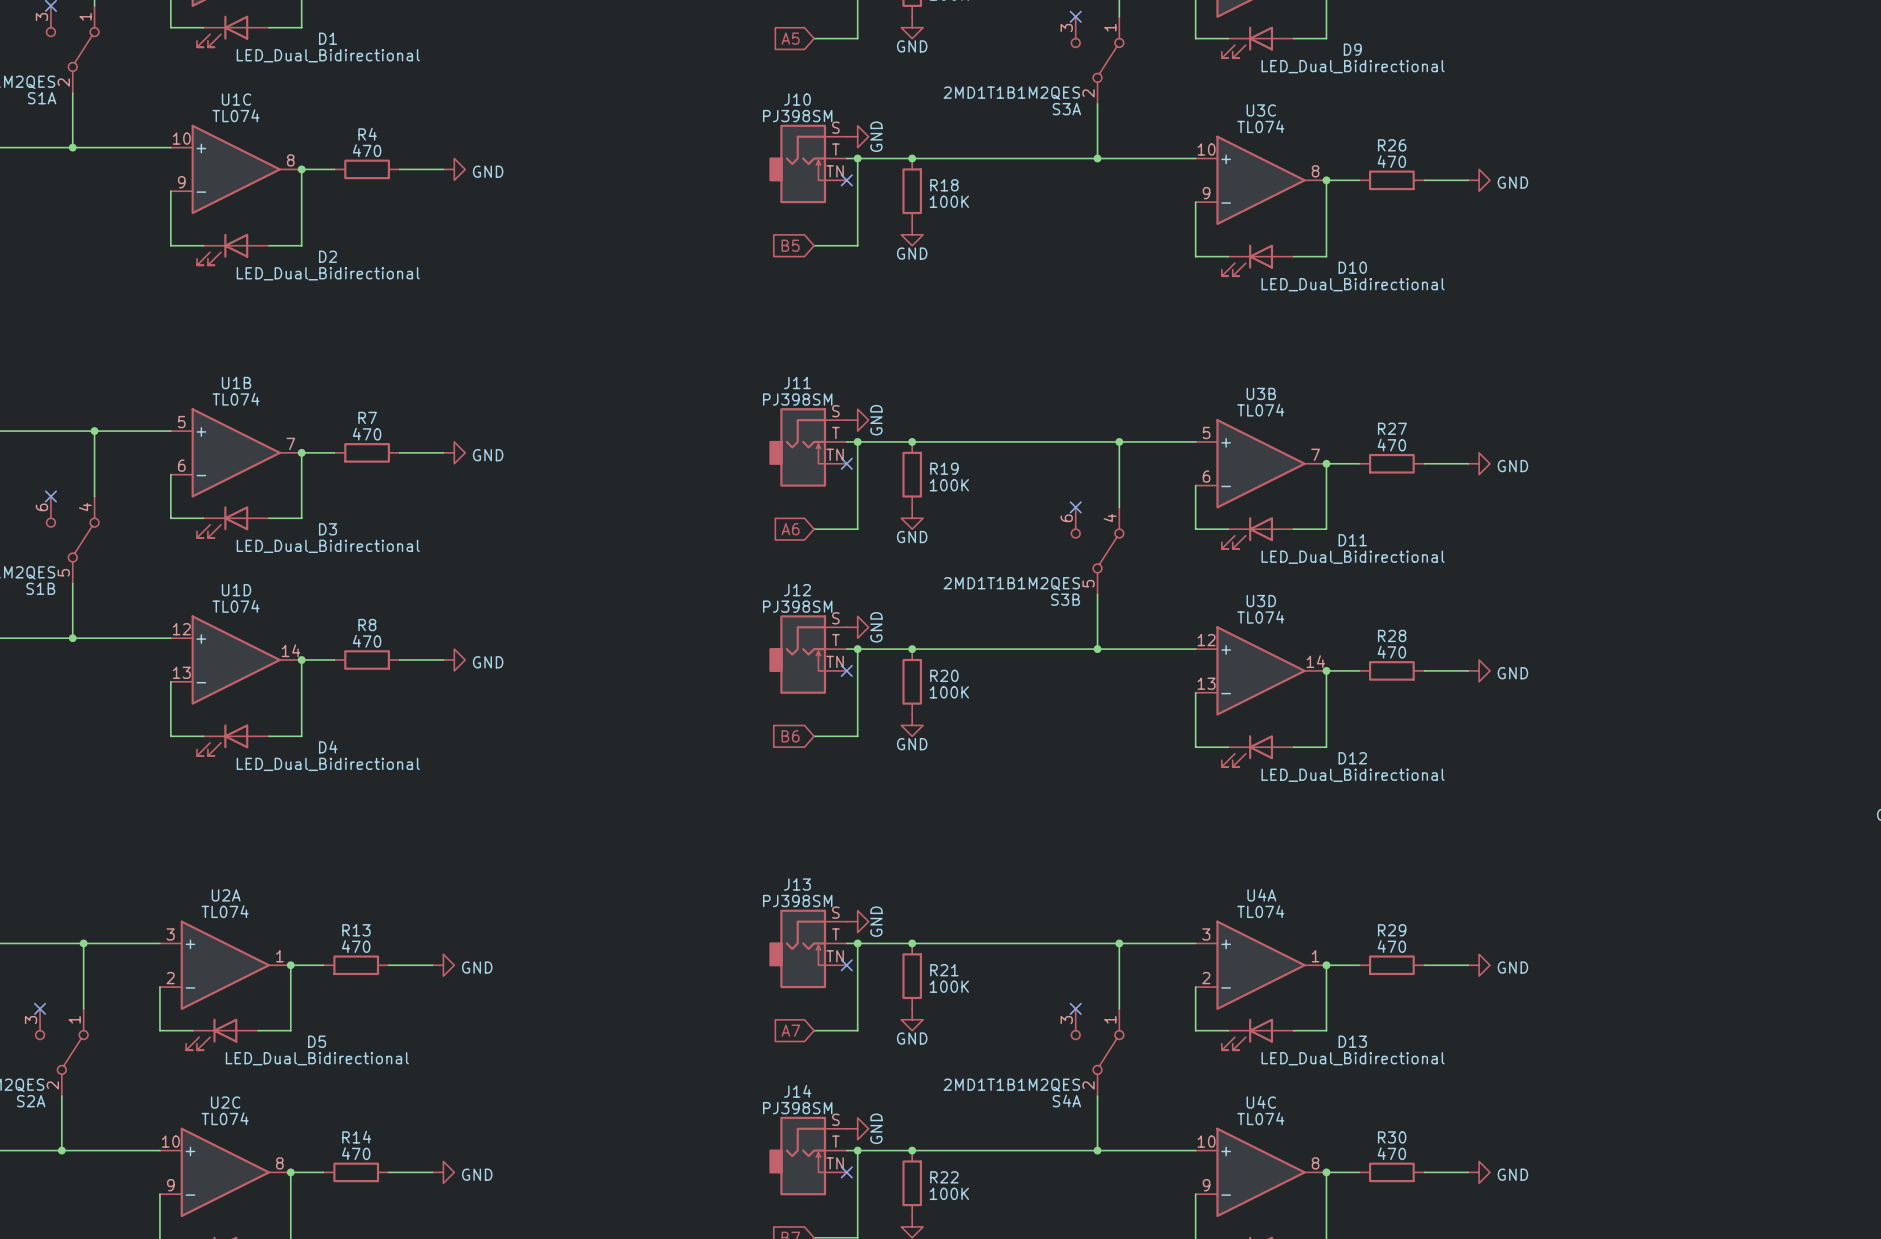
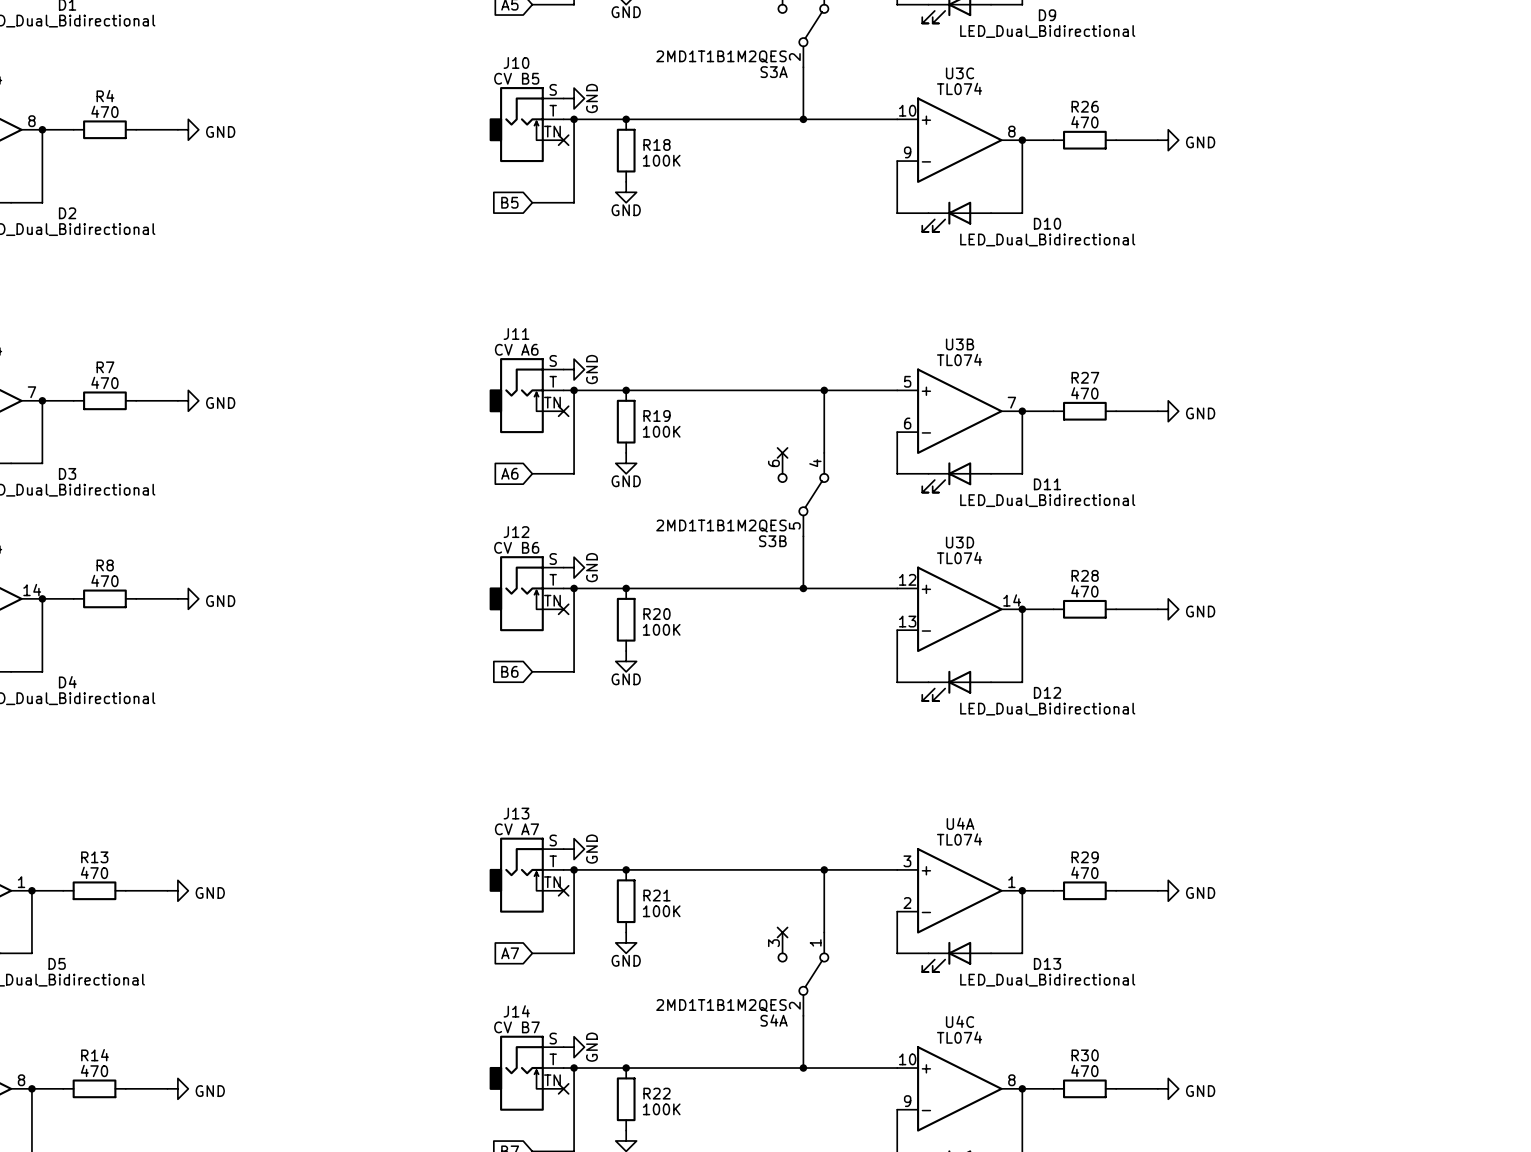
J10 value: PJ398SM (797, 116) -> CV B5 (516, 78)
J11 value: PJ398SM (797, 399) -> CV A6 (516, 349)
J12 value: PJ398SM (797, 606) -> CV B6 (516, 547)
J13 value: PJ398SM (797, 900) -> CV A7 (516, 829)
J14 value: PJ398SM (797, 1108) -> CV B7 (516, 1027)

